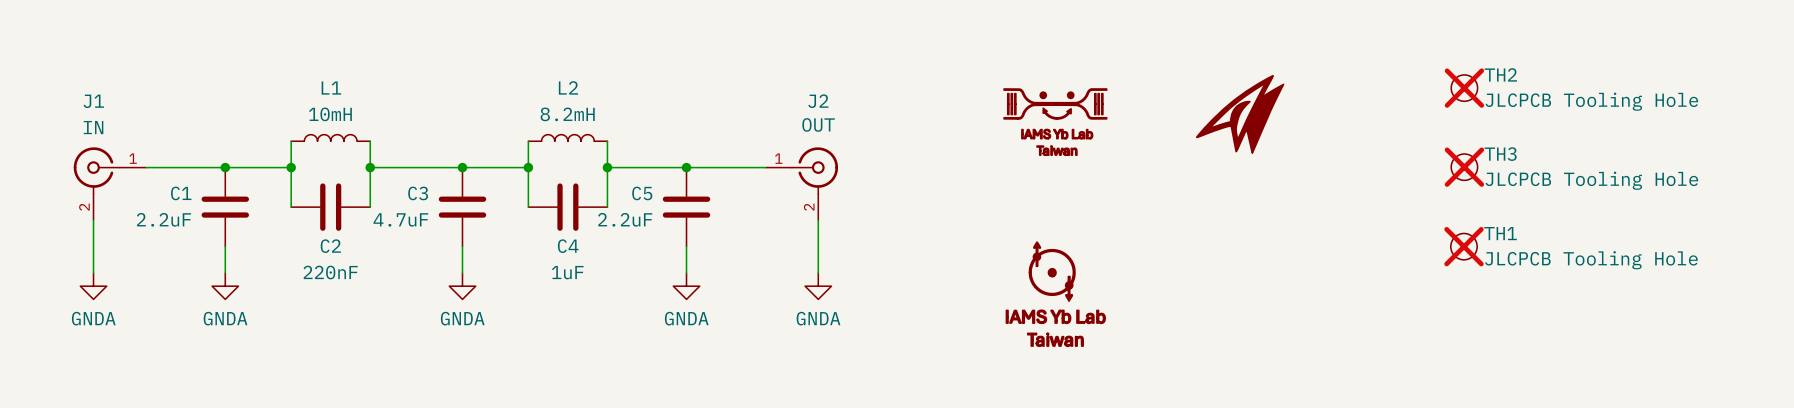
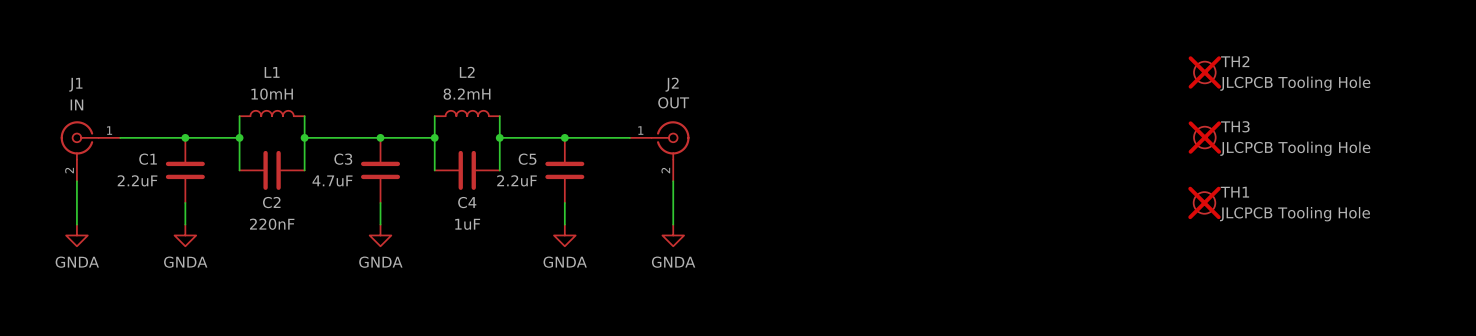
part: (1240, 114) -> none
part: (1055, 122) -> none
part: (1055, 294) -> none

